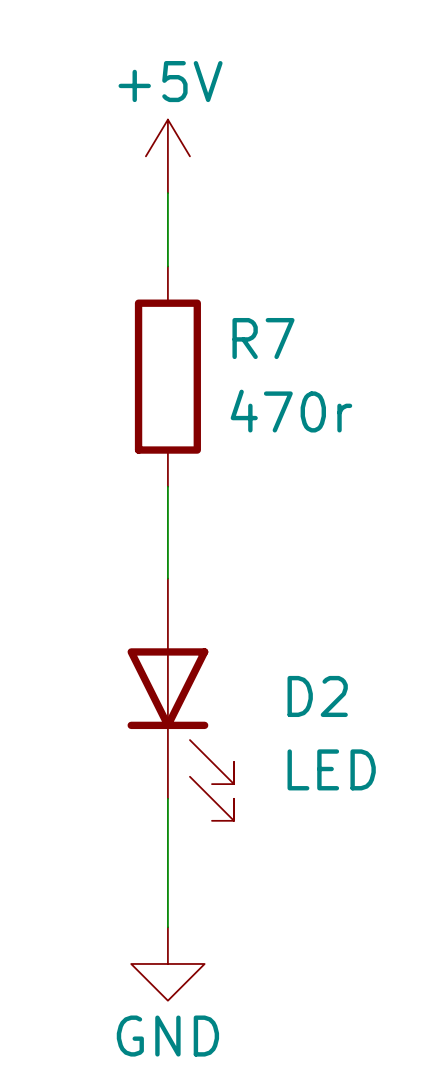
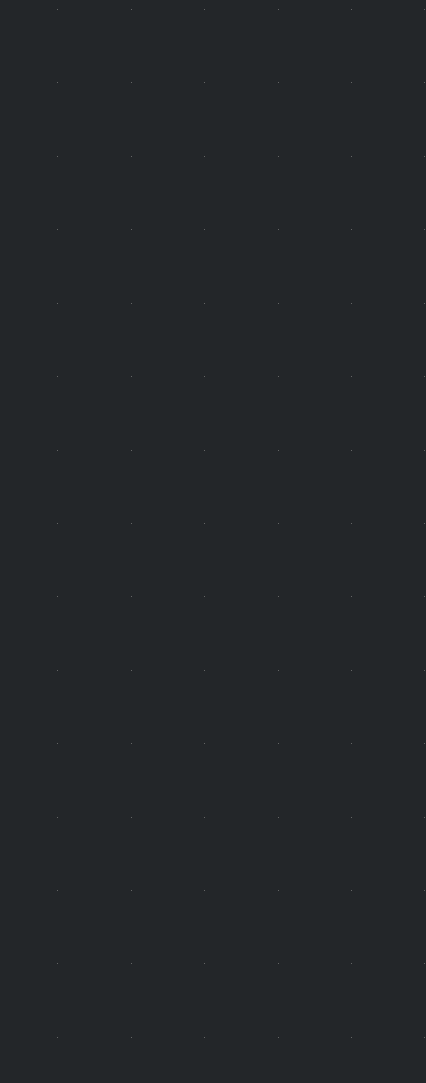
power symbol: +5V (167, 156) -> none
wire: (167, 193) (167, 266) -> none
R7: 470r (167, 376) -> none
wire: (167, 486) (167, 578) -> none
D2: LED (180, 699) -> none
wire: (167, 798) (167, 927) -> none
power symbol: GND (167, 963) -> none

